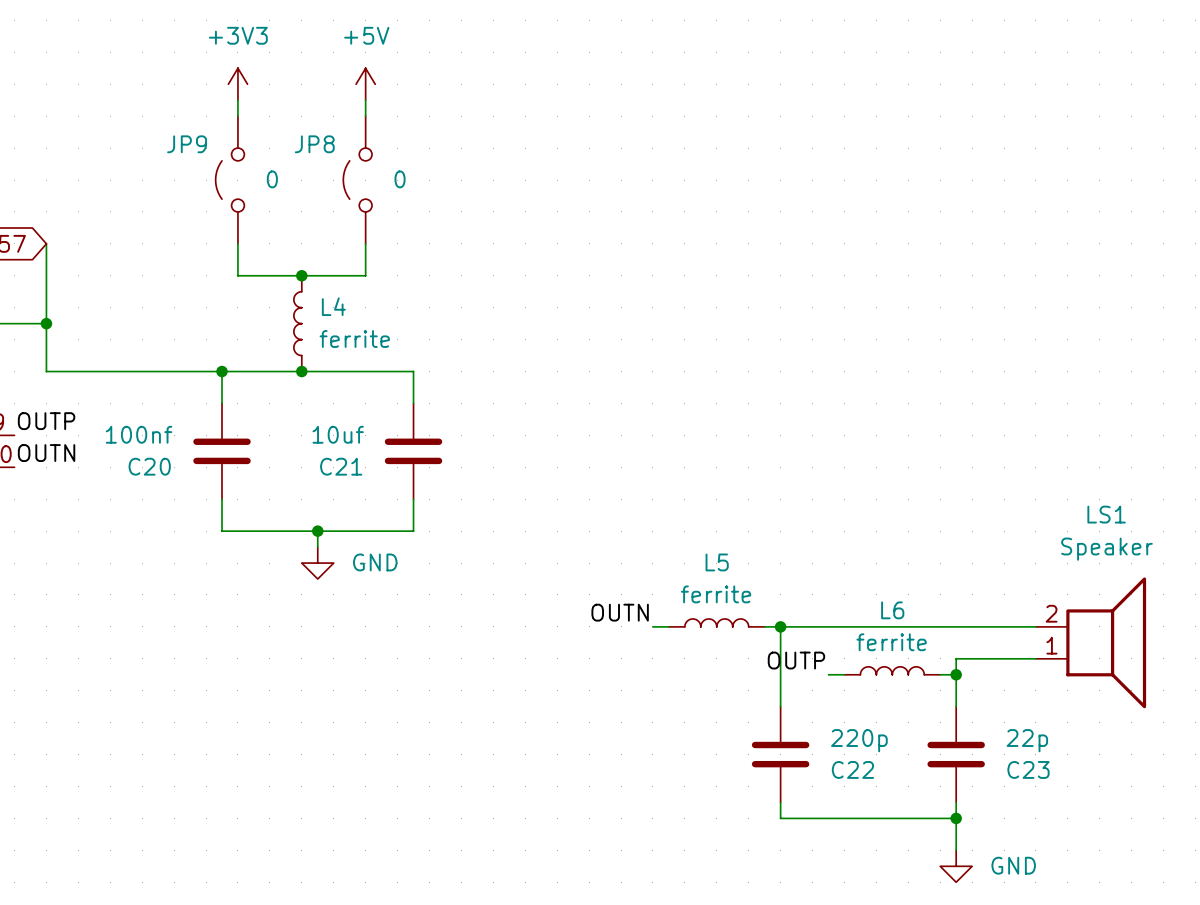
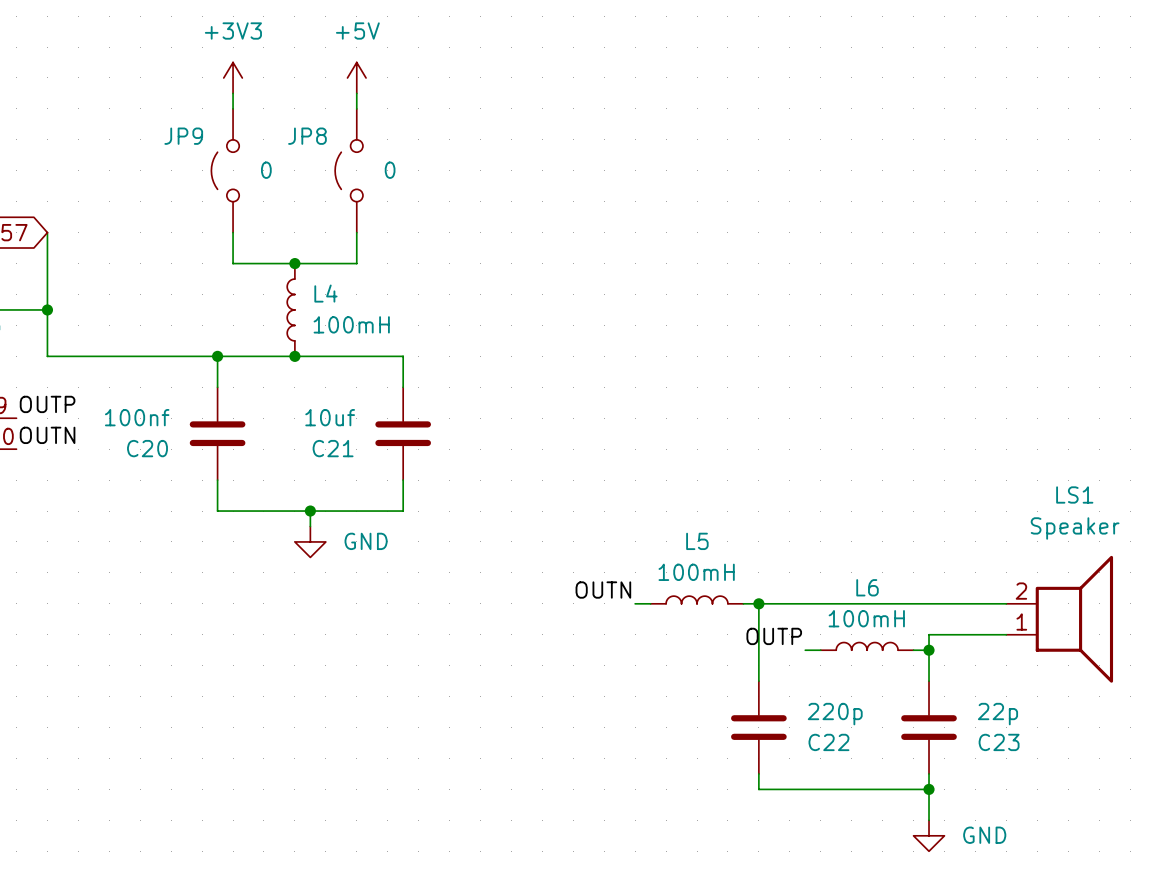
L4 value: ferrite (354, 339) -> 100mH (351, 324)
L5 value: ferrite (716, 594) -> 100mH (696, 572)
L6 value: ferrite (891, 642) -> 100mH (866, 618)

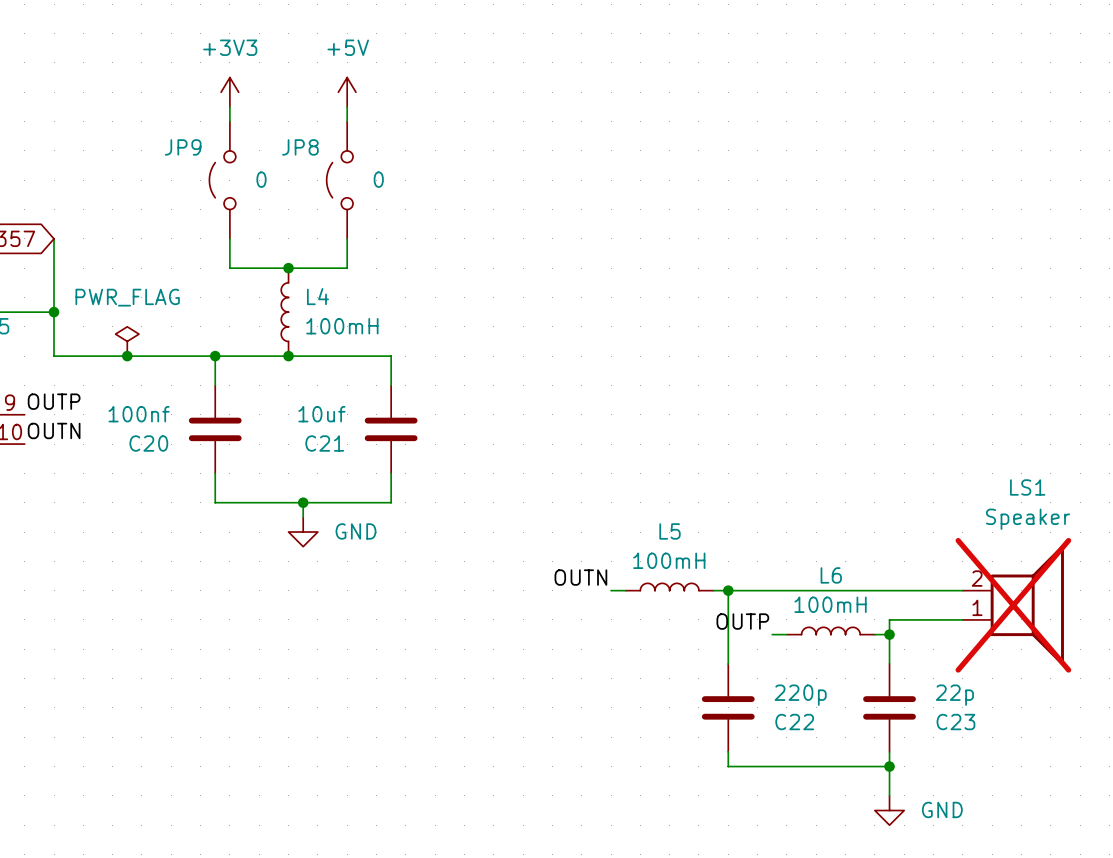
power symbol: none -> PWR_FLAG (127, 341)
junction: none -> (127, 356)
LS1 do-not-place cross: none -> (1013, 605)

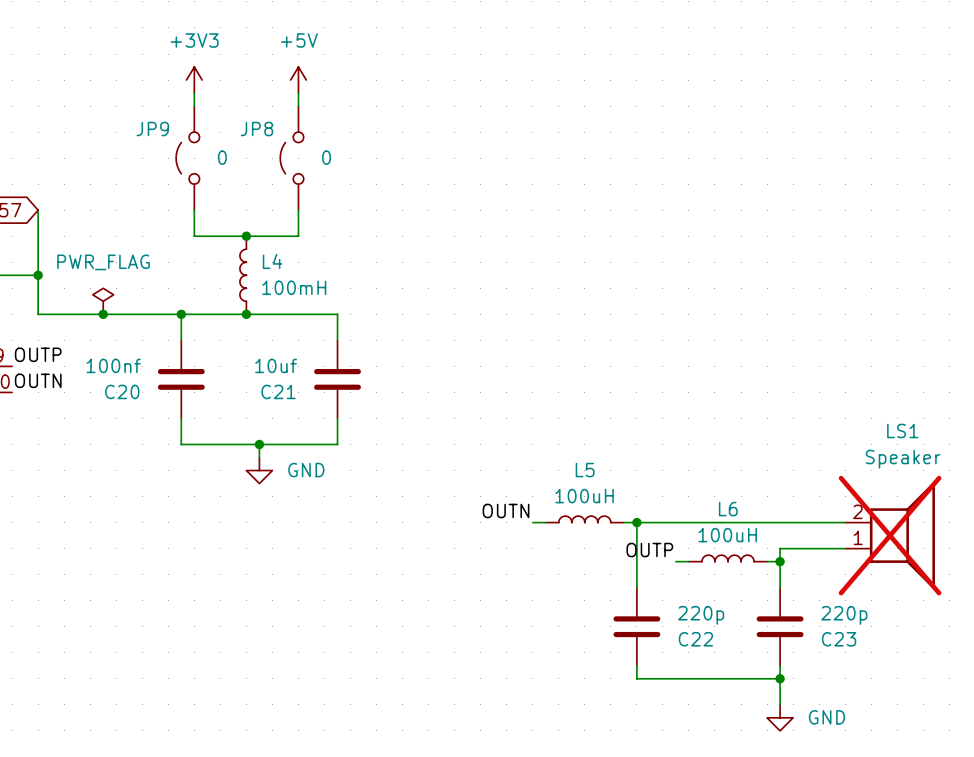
L5 value: 100mH (669, 560) -> 100uH (584, 496)
L6 value: 100mH (830, 604) -> 100uH (727, 535)
C23 value: 22p (954, 695) -> 220p (844, 615)

